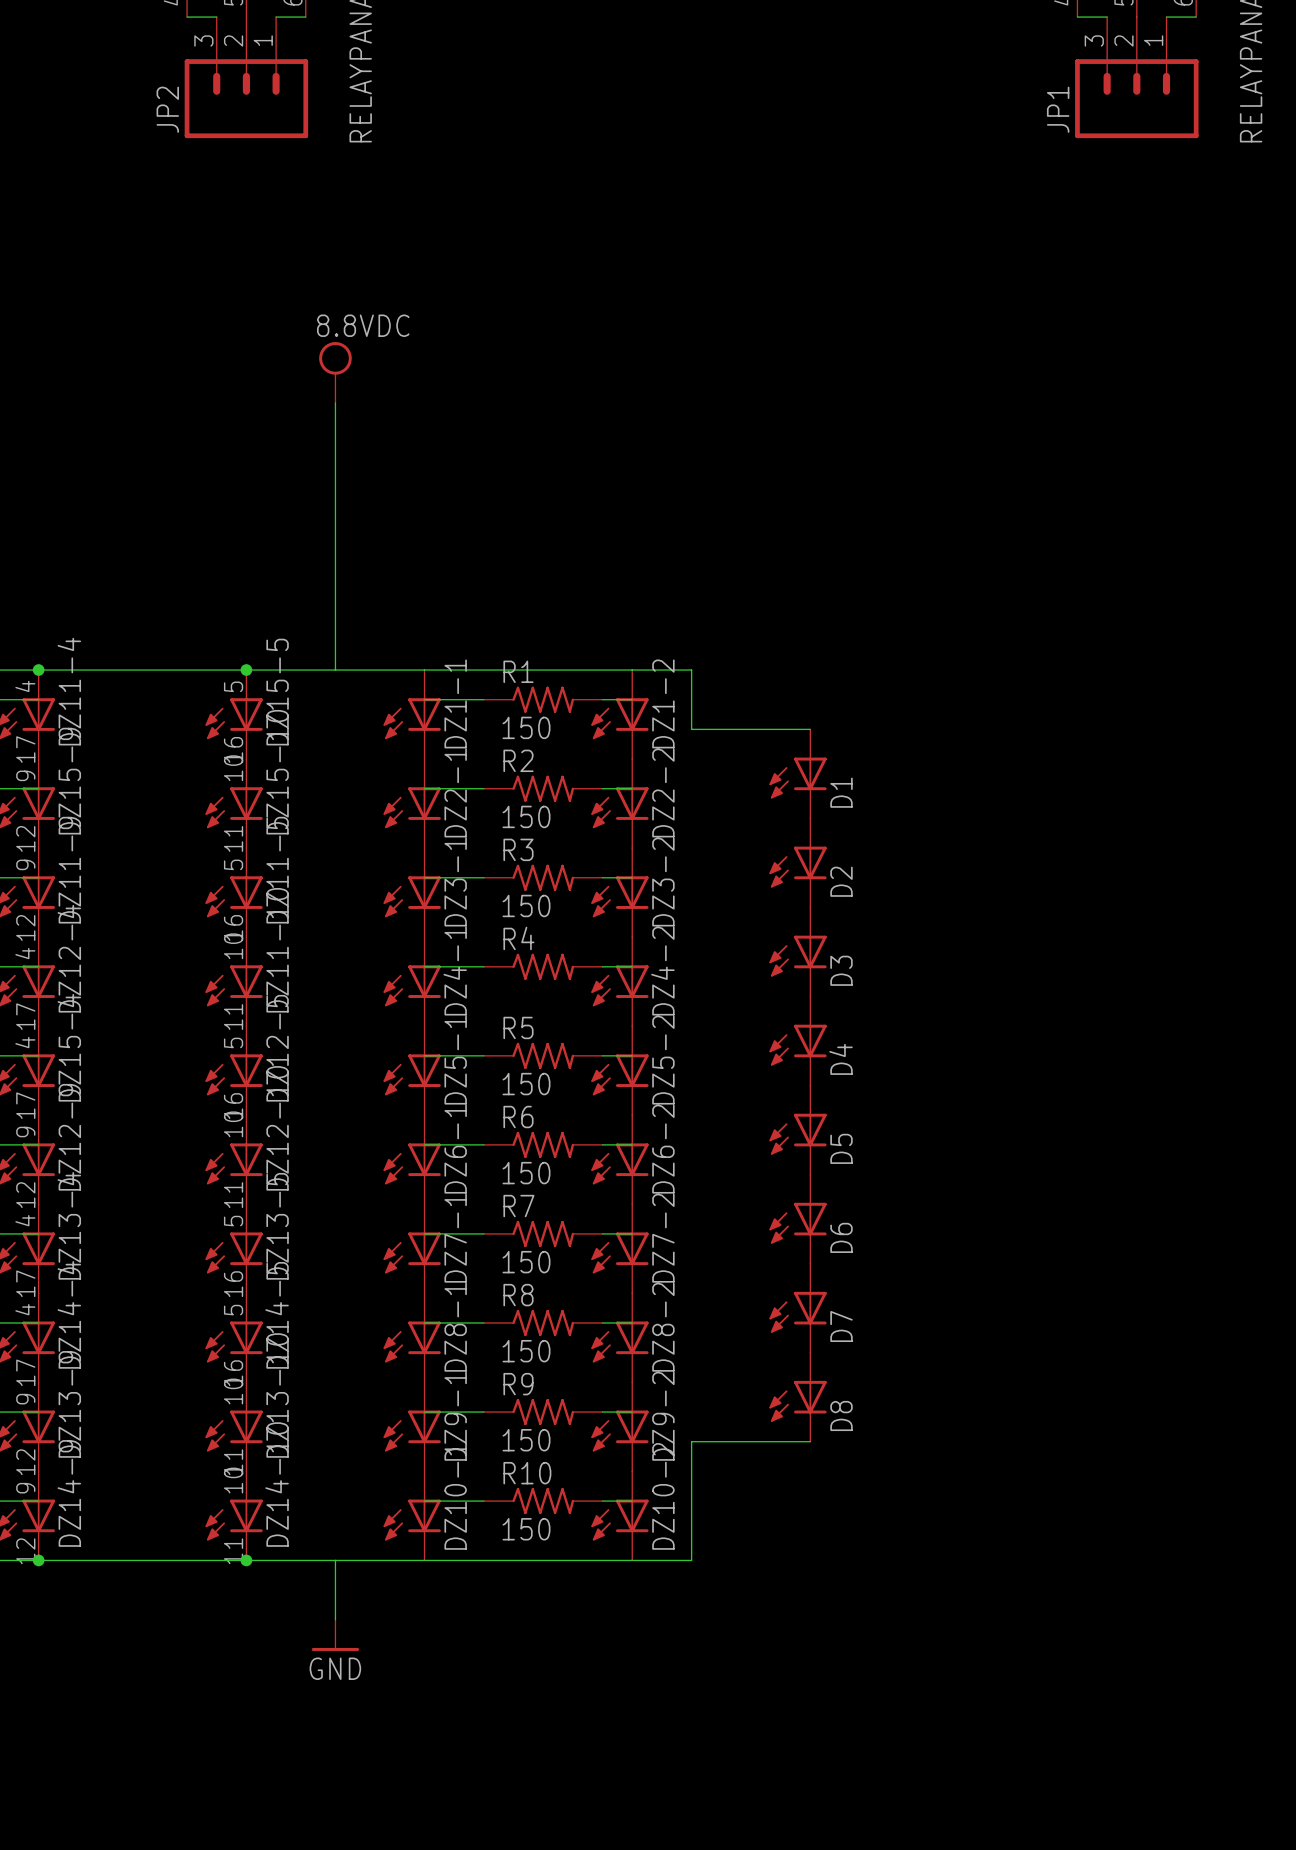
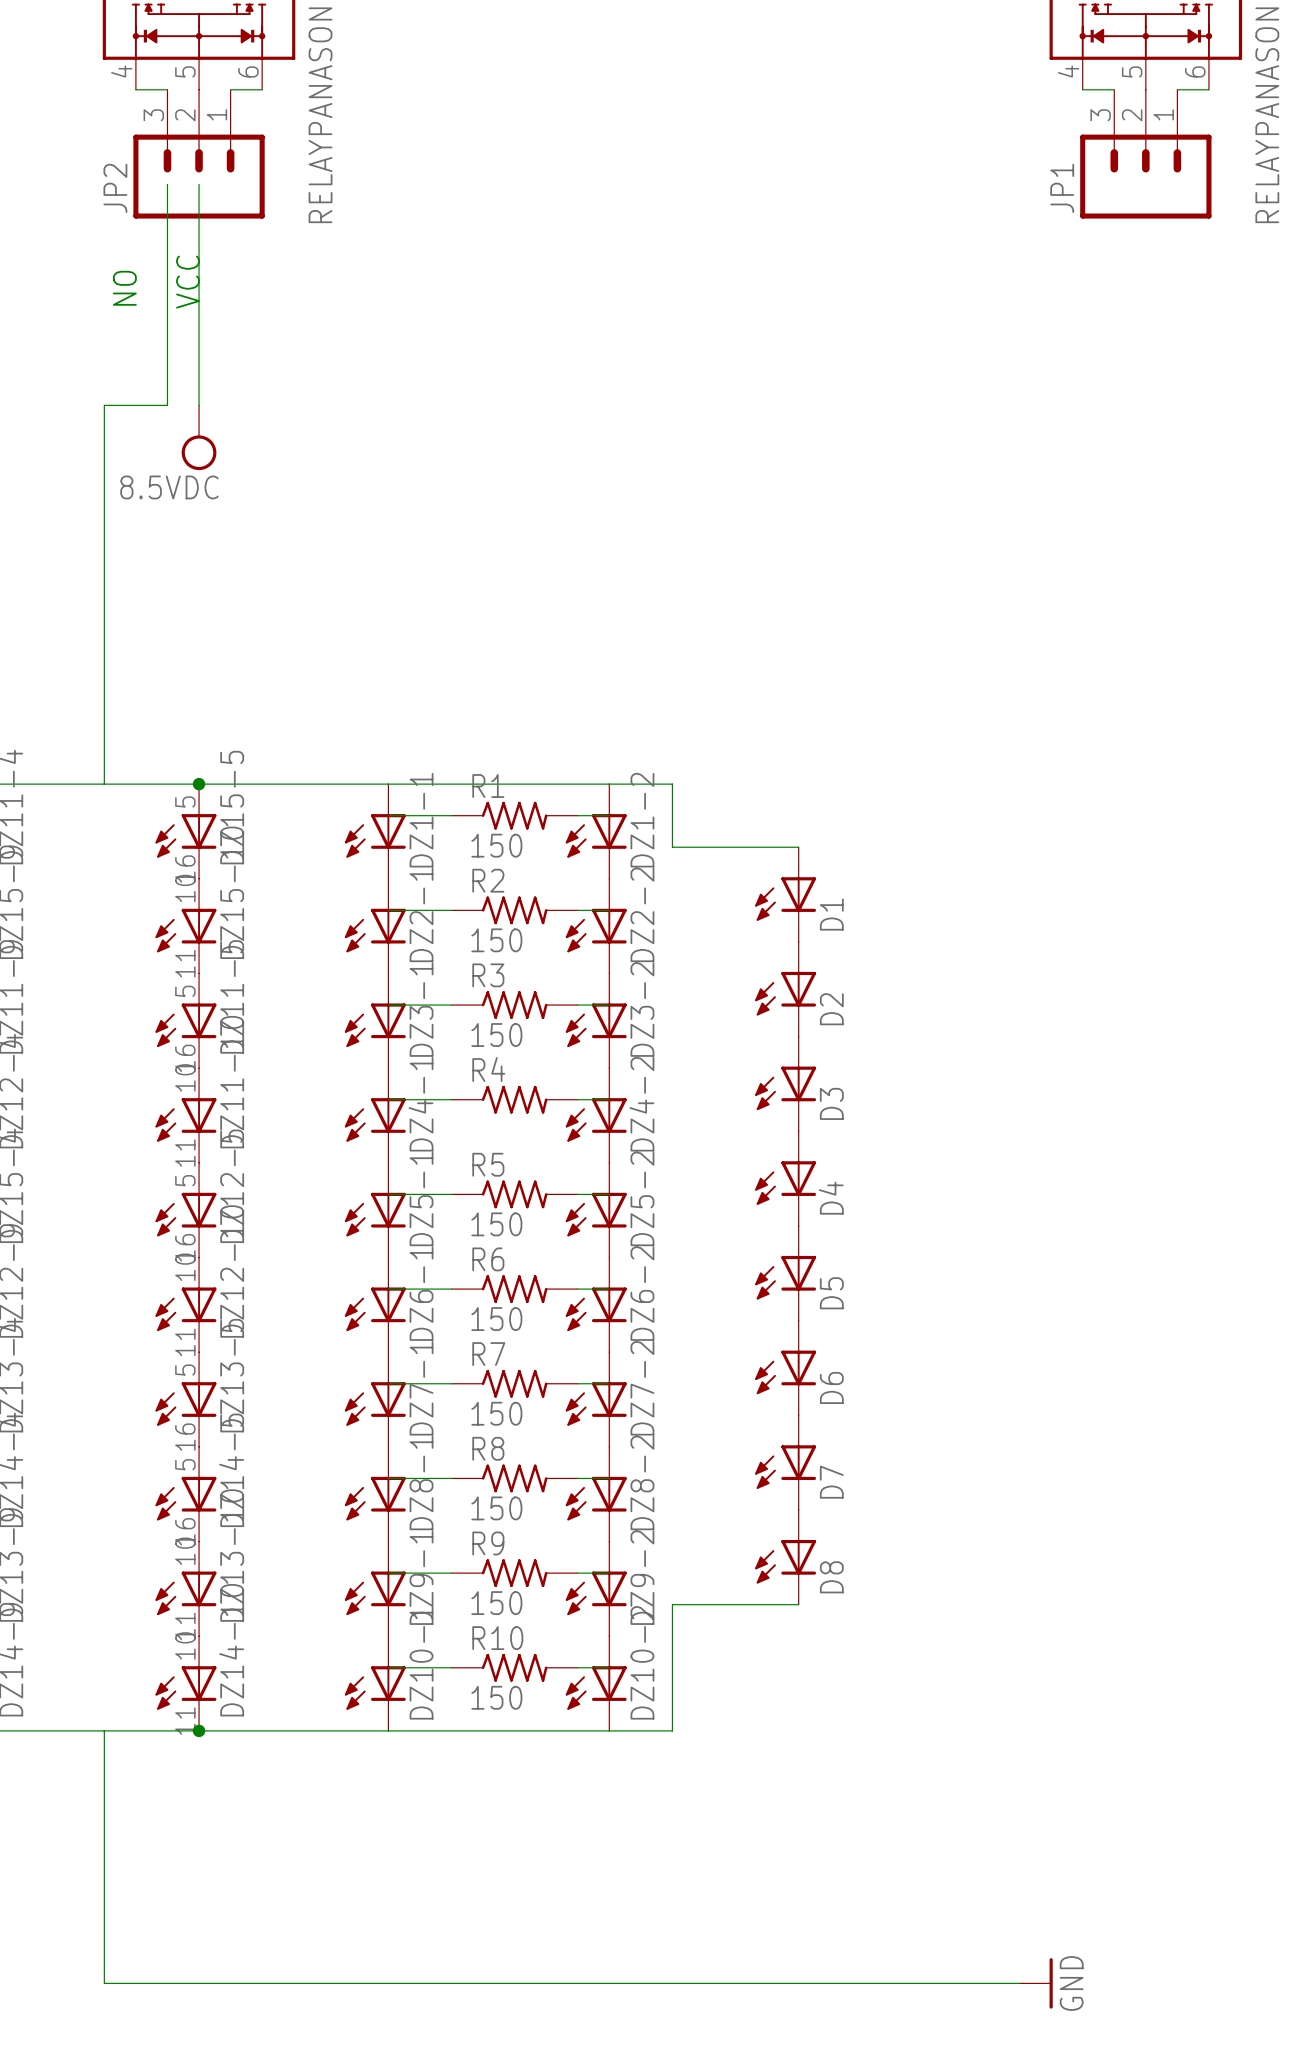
wire: none -> (167, 184) (167, 405) (104, 405) (104, 784)
wire: none -> (199, 184) (199, 405)
text: none -> VCC (187, 282)
text: none -> NO (124, 288)
power symbol: none -> 8.5VDC (199, 437)
power symbol: 8.8VDC (335, 372) -> none
wire: (335, 402) (335, 670) -> none
wire: none -> (104, 1730) (104, 1983) (1019, 1983)
wire: (335, 1560) (335, 1619) -> none
power symbol: GND (335, 1635) -> none
power symbol: none -> GND (1036, 1983)

